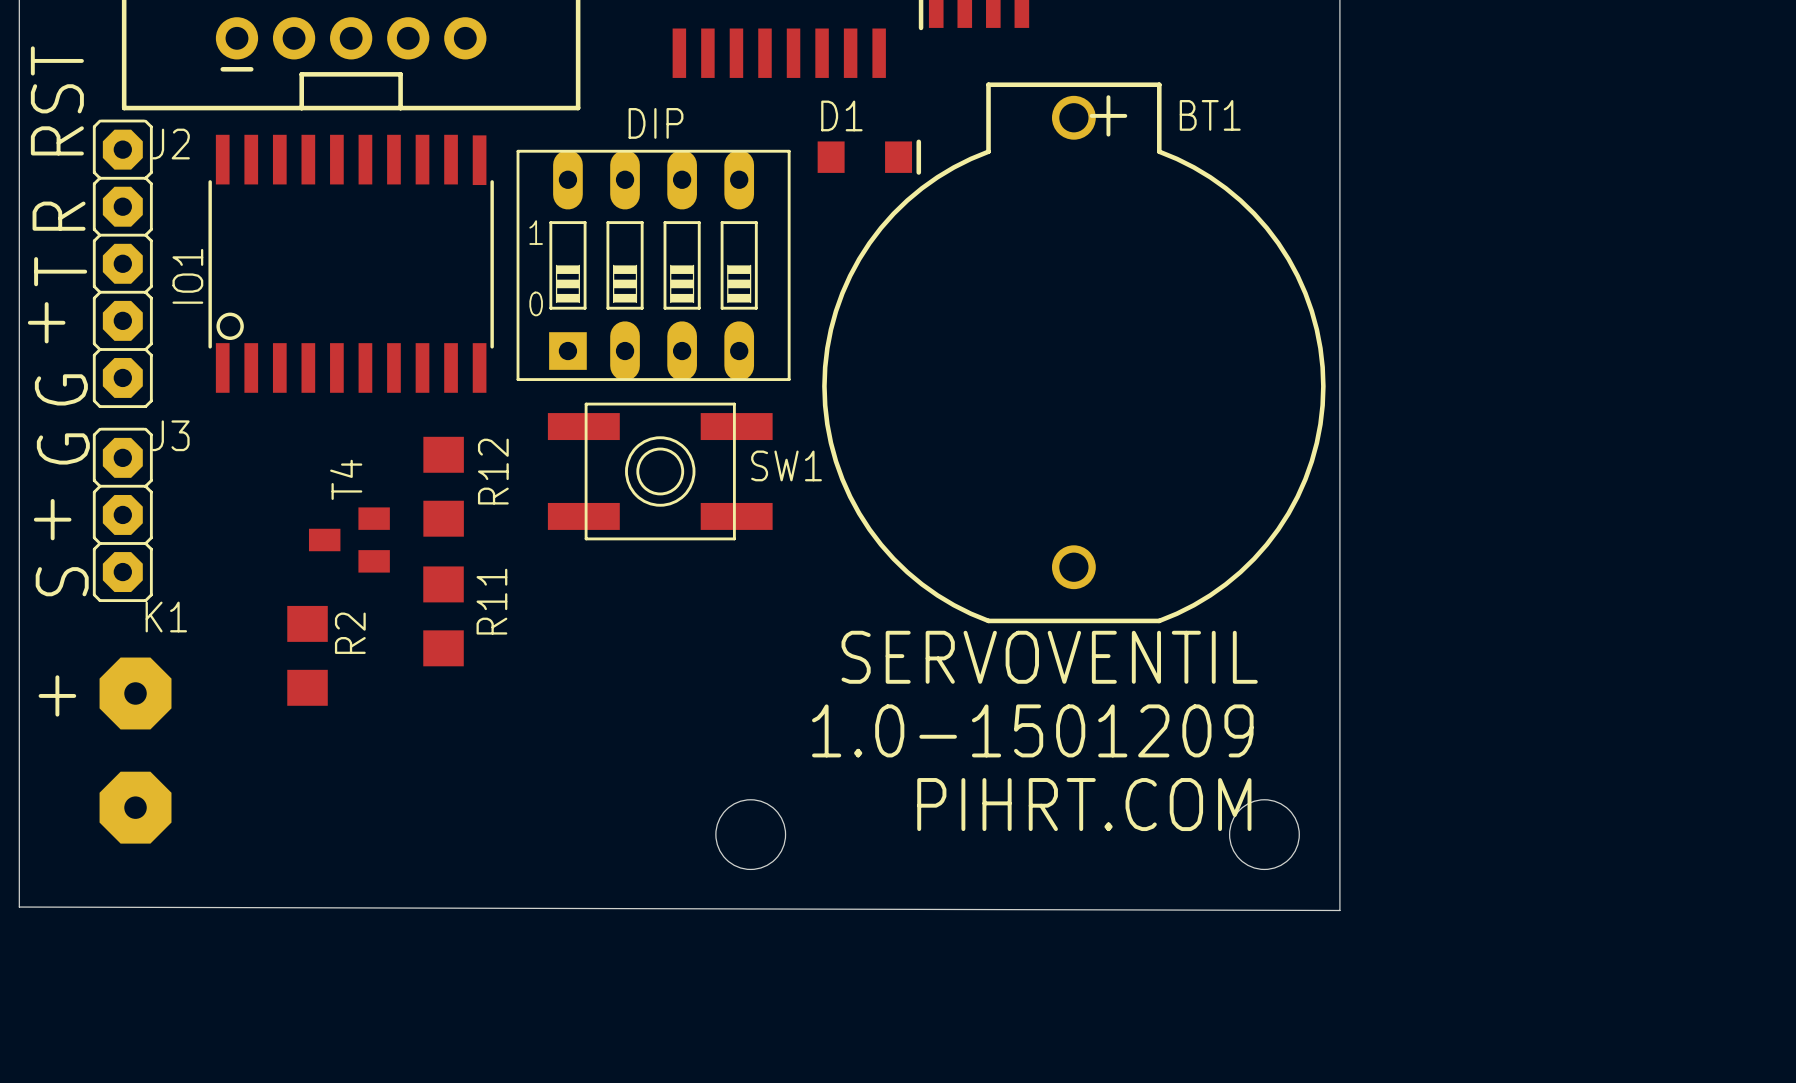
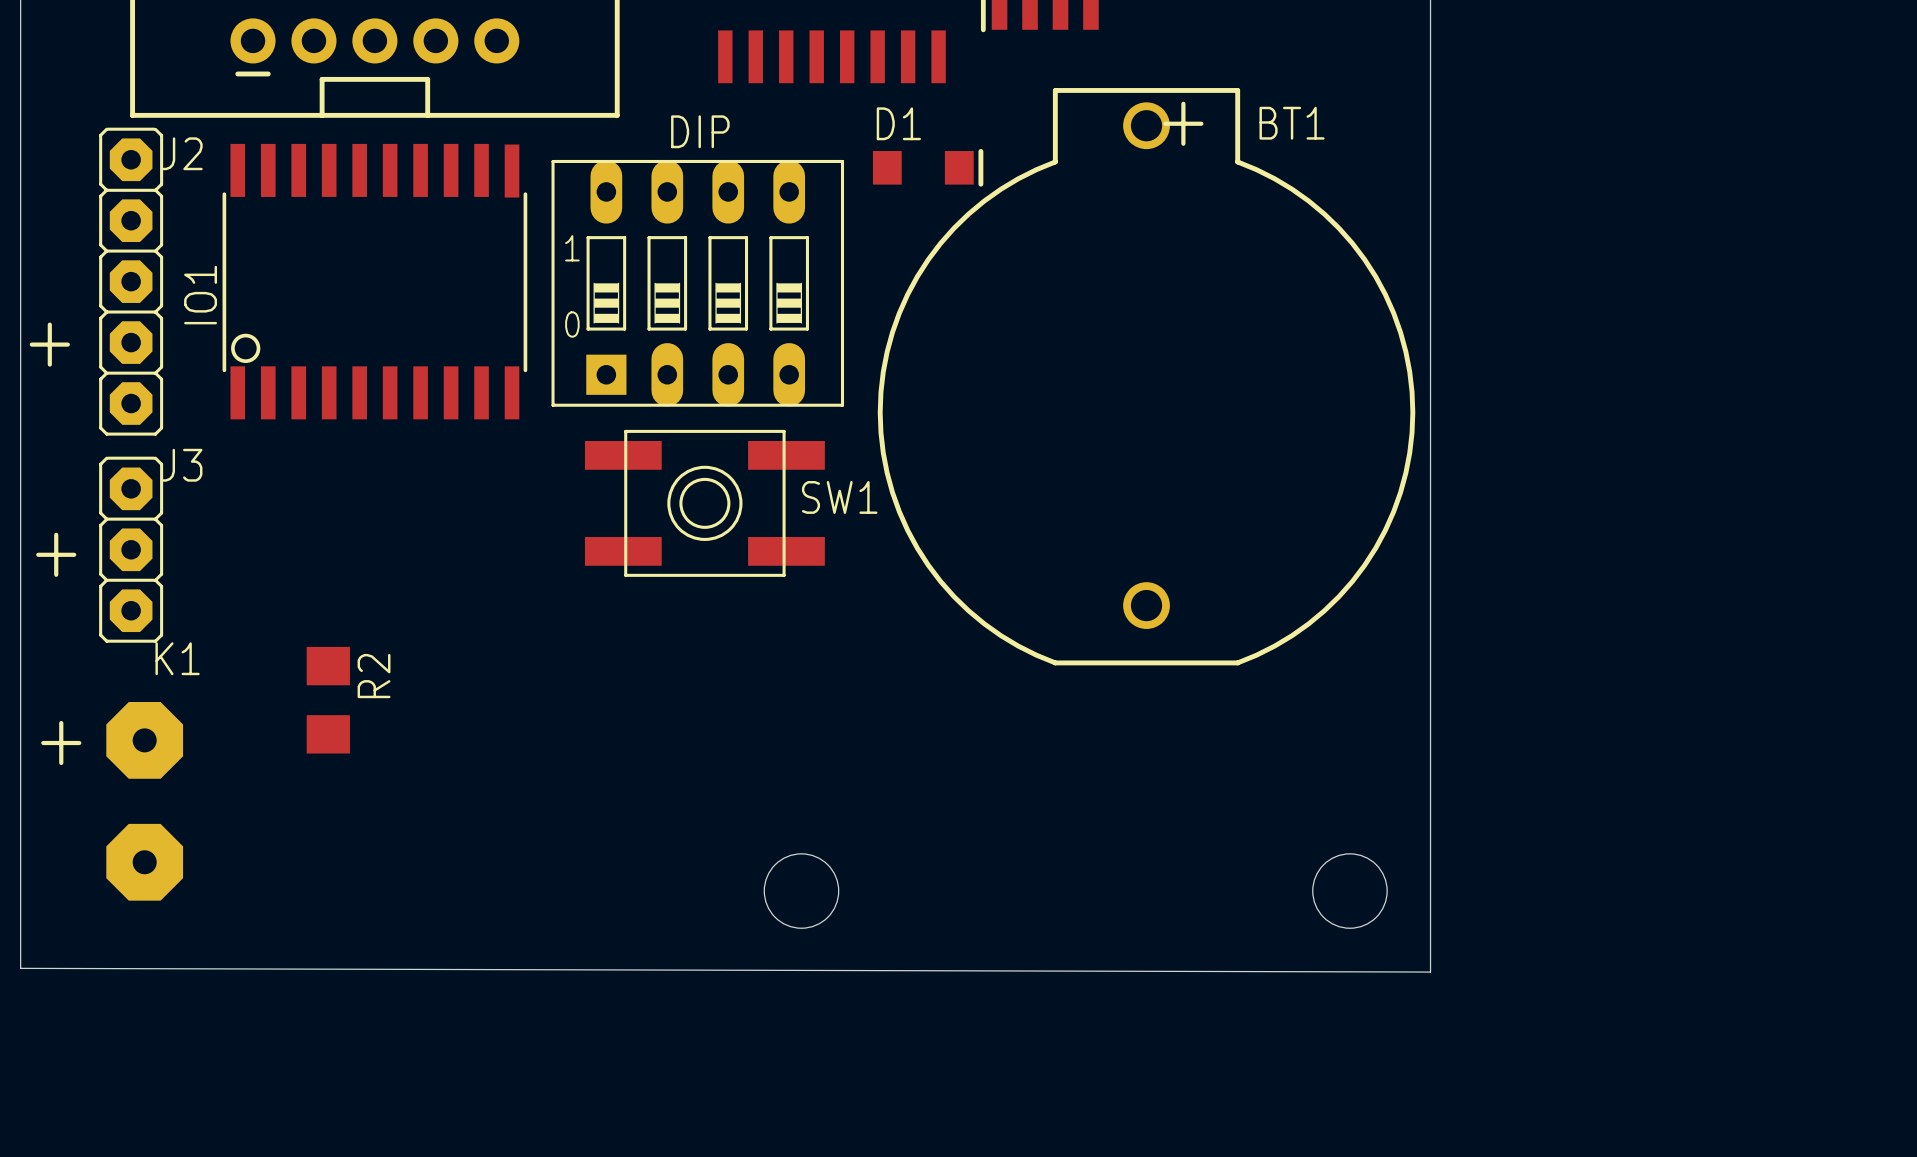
text: RST (57, 100) -> none
text: R (59, 216) -> none
text: T (60, 271) -> none
text: G (61, 389) -> none
text: G (63, 448) -> none
R12: (443, 486) -> none
T4: (349, 540) -> none
text: S (62, 581) -> none
R11: (443, 616) -> none
text: SERVOVENTIL (1049, 657) -> none
text: 1.0-1501209 (1032, 730) -> none
text: PIHRT.COM (1084, 804) -> none

